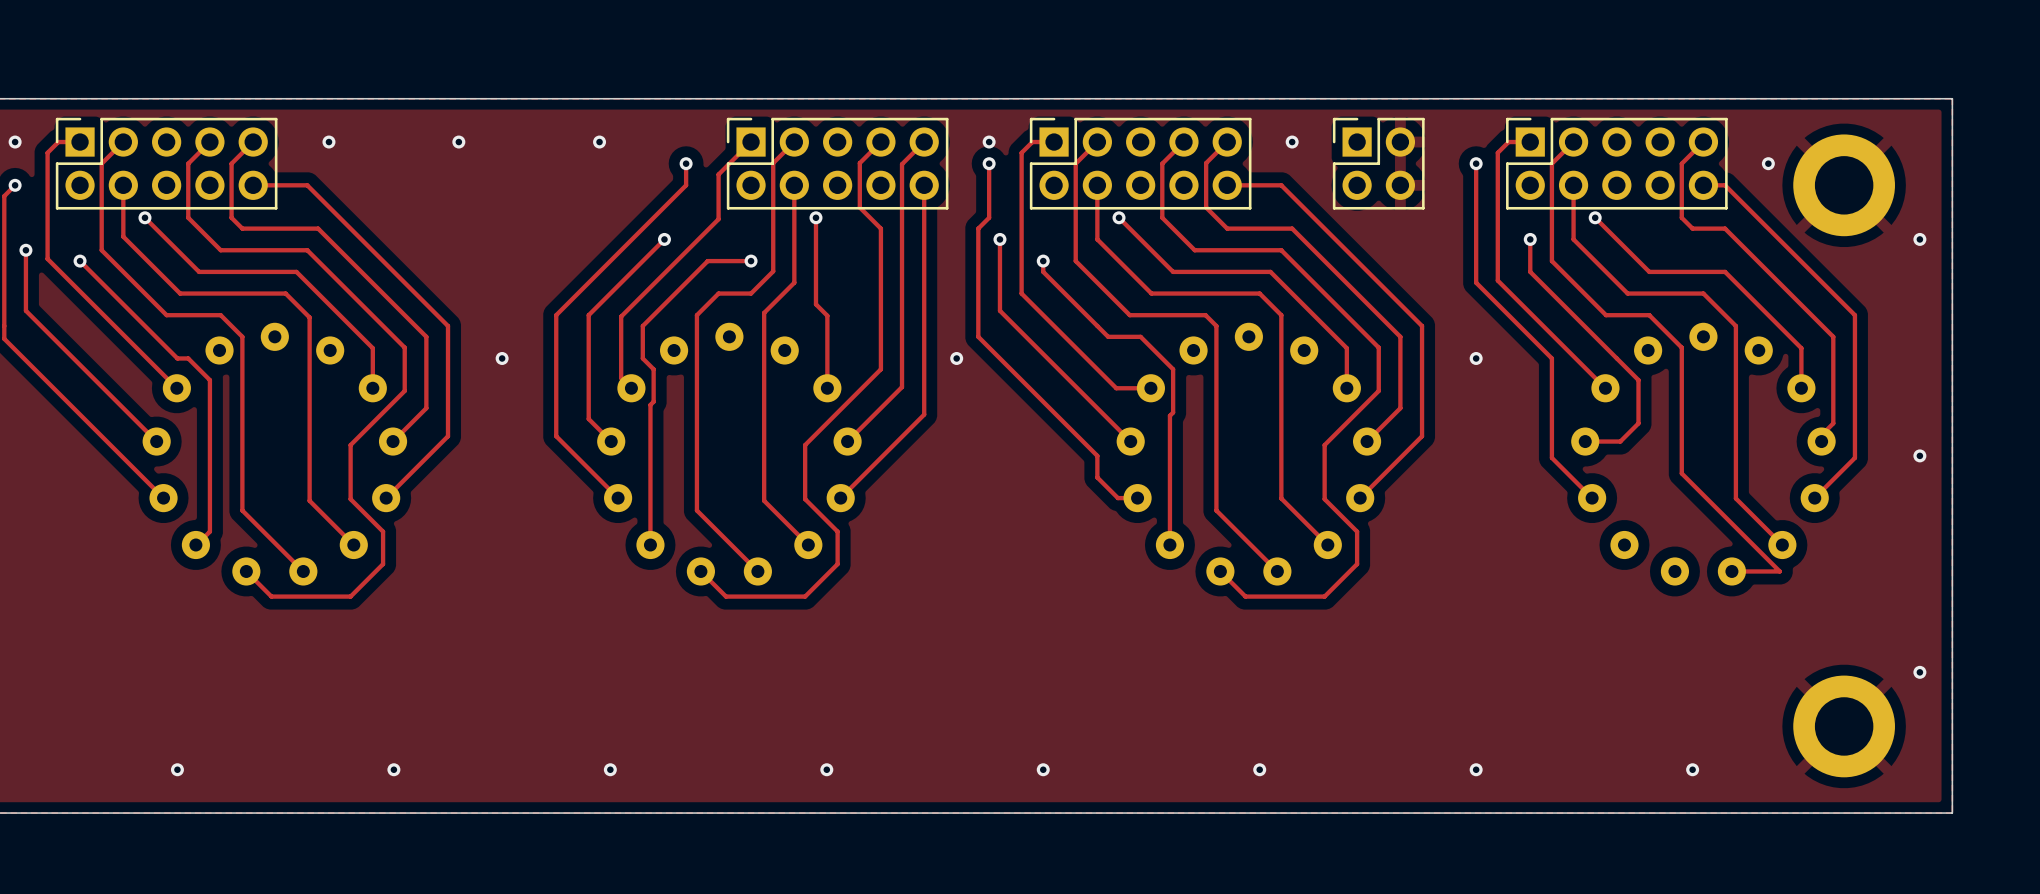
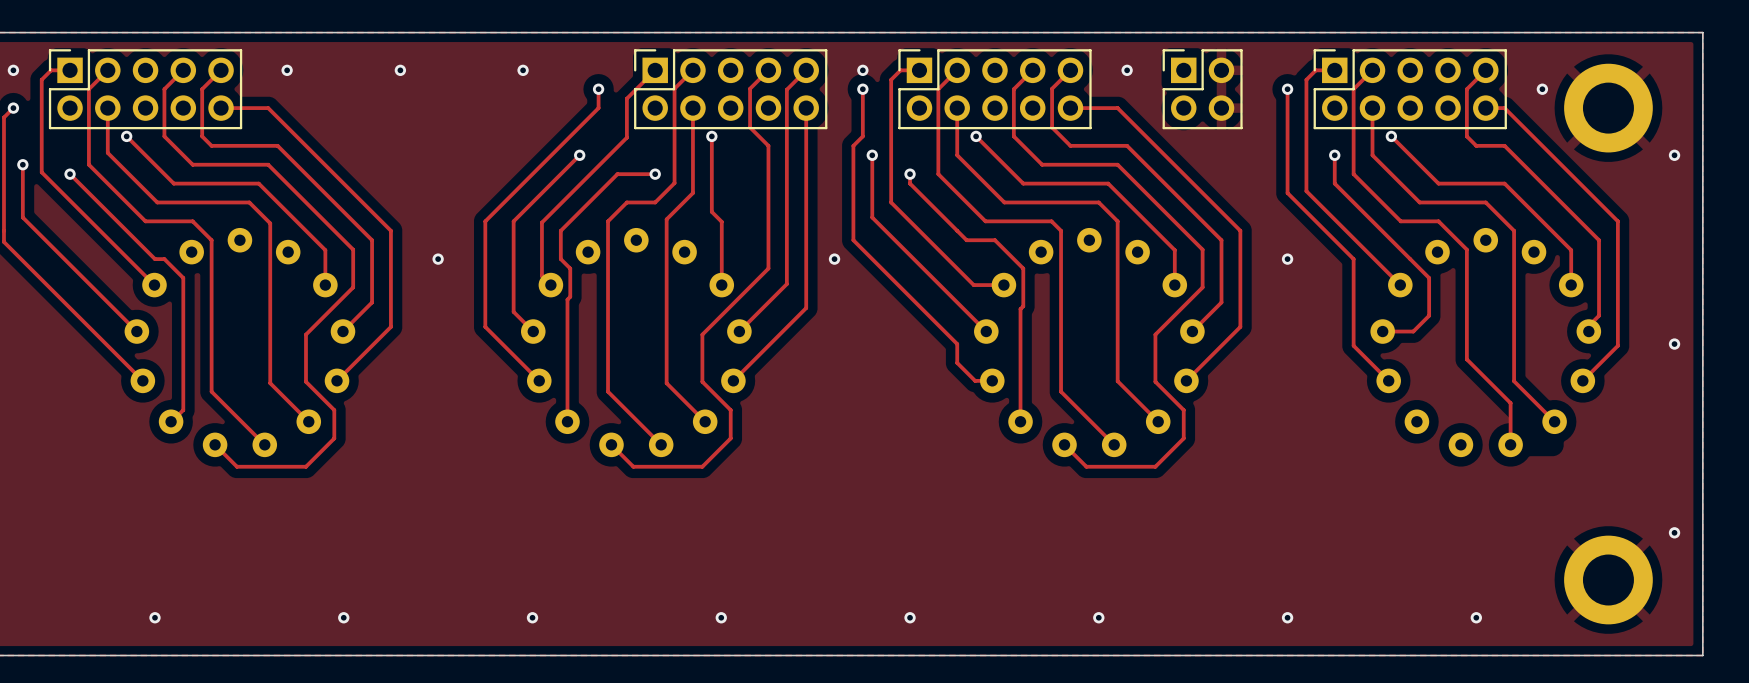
track: (1731, 523) (1779, 571) (1731, 571) -> (1510, 403) (1510, 444)

